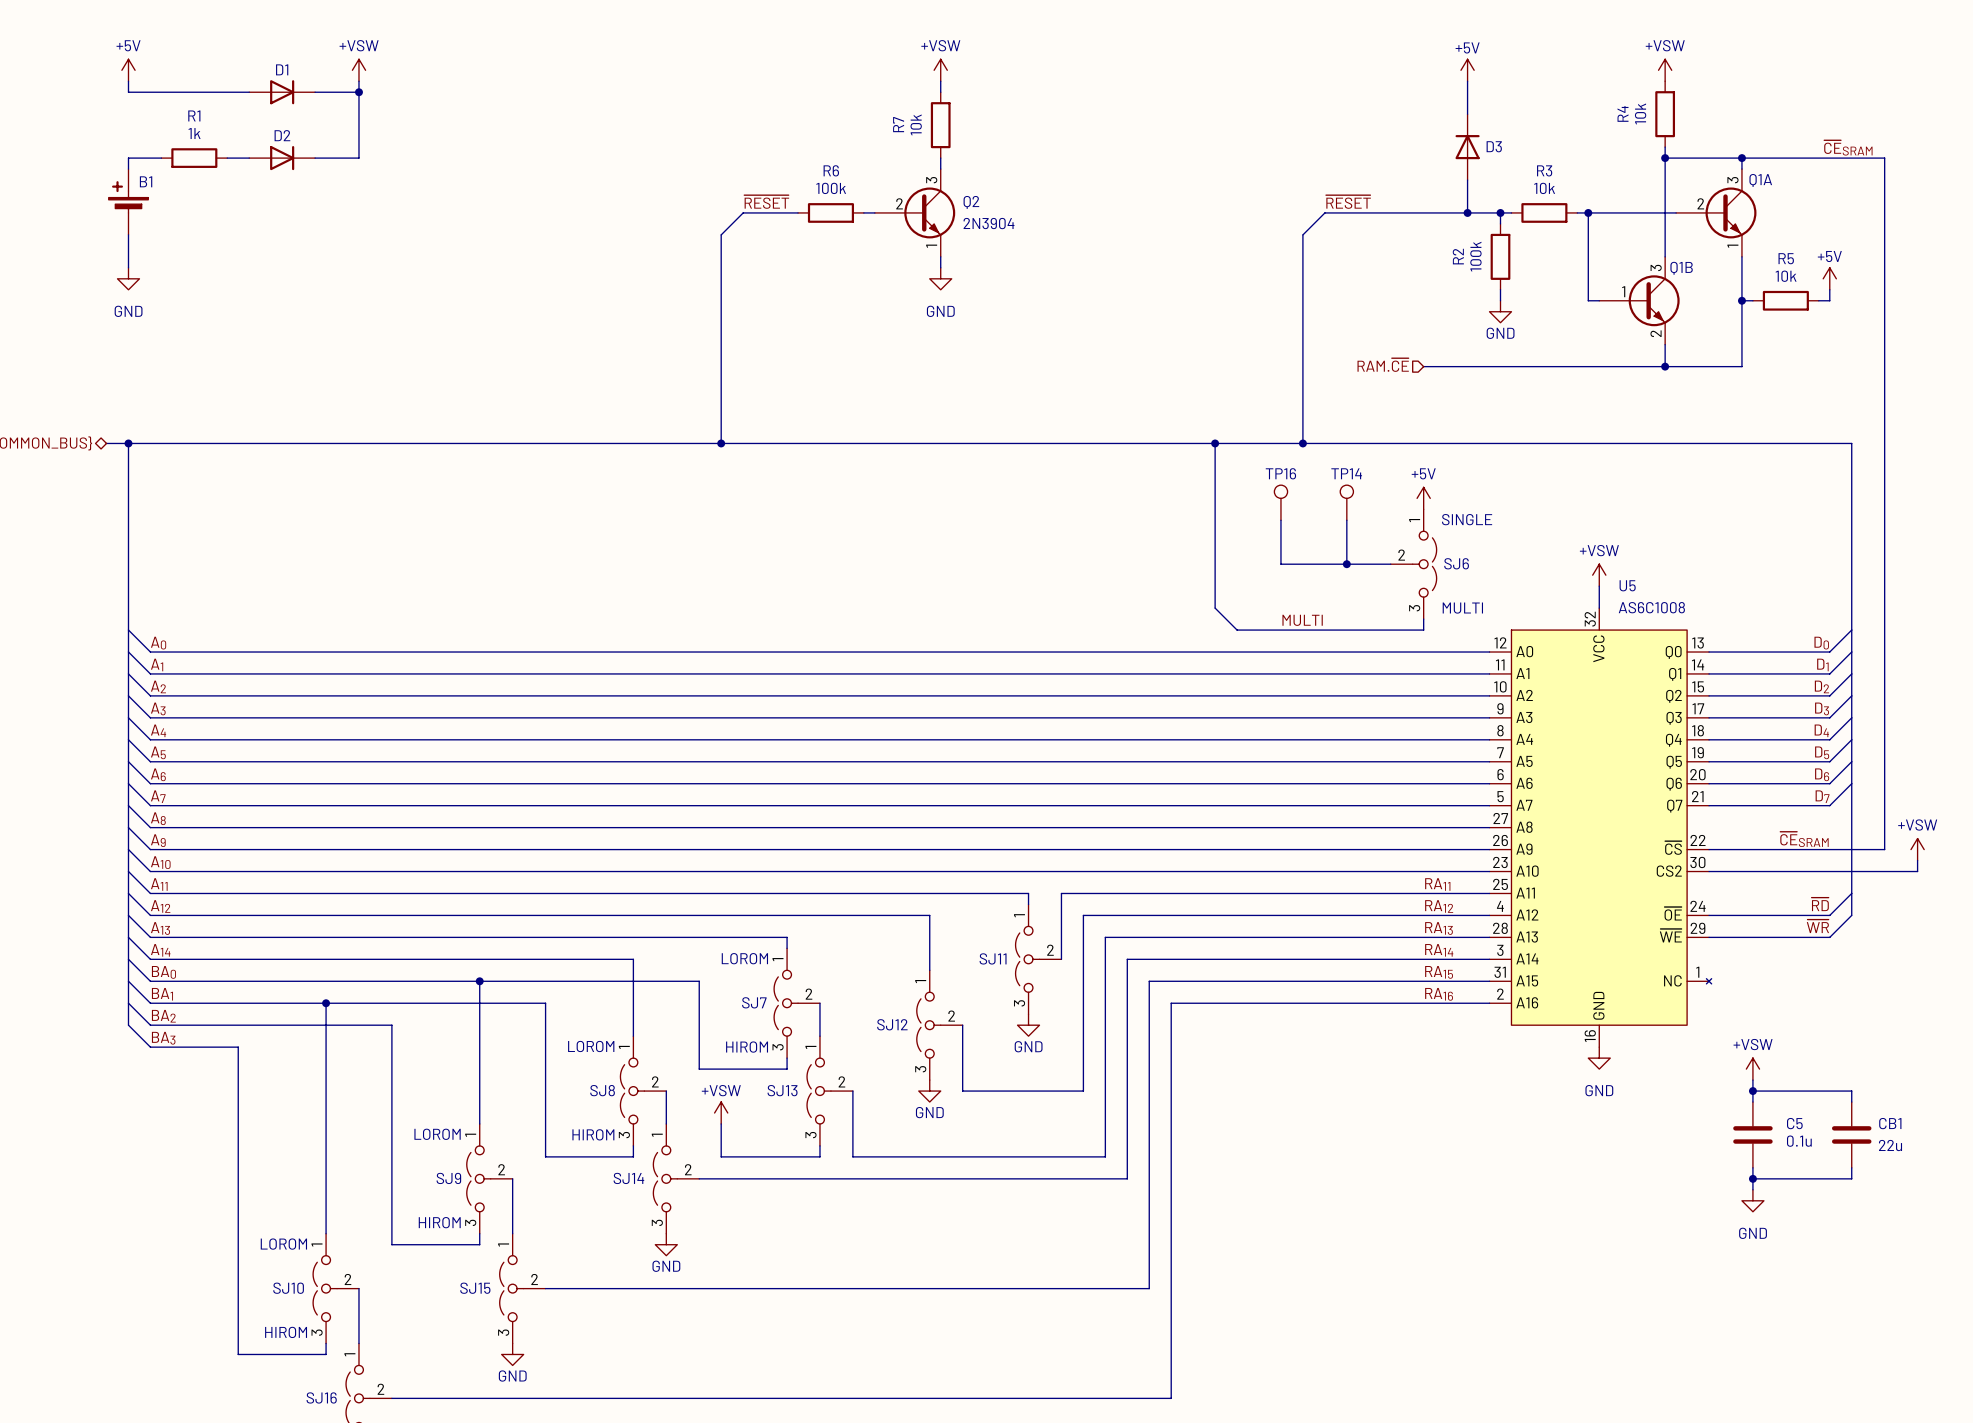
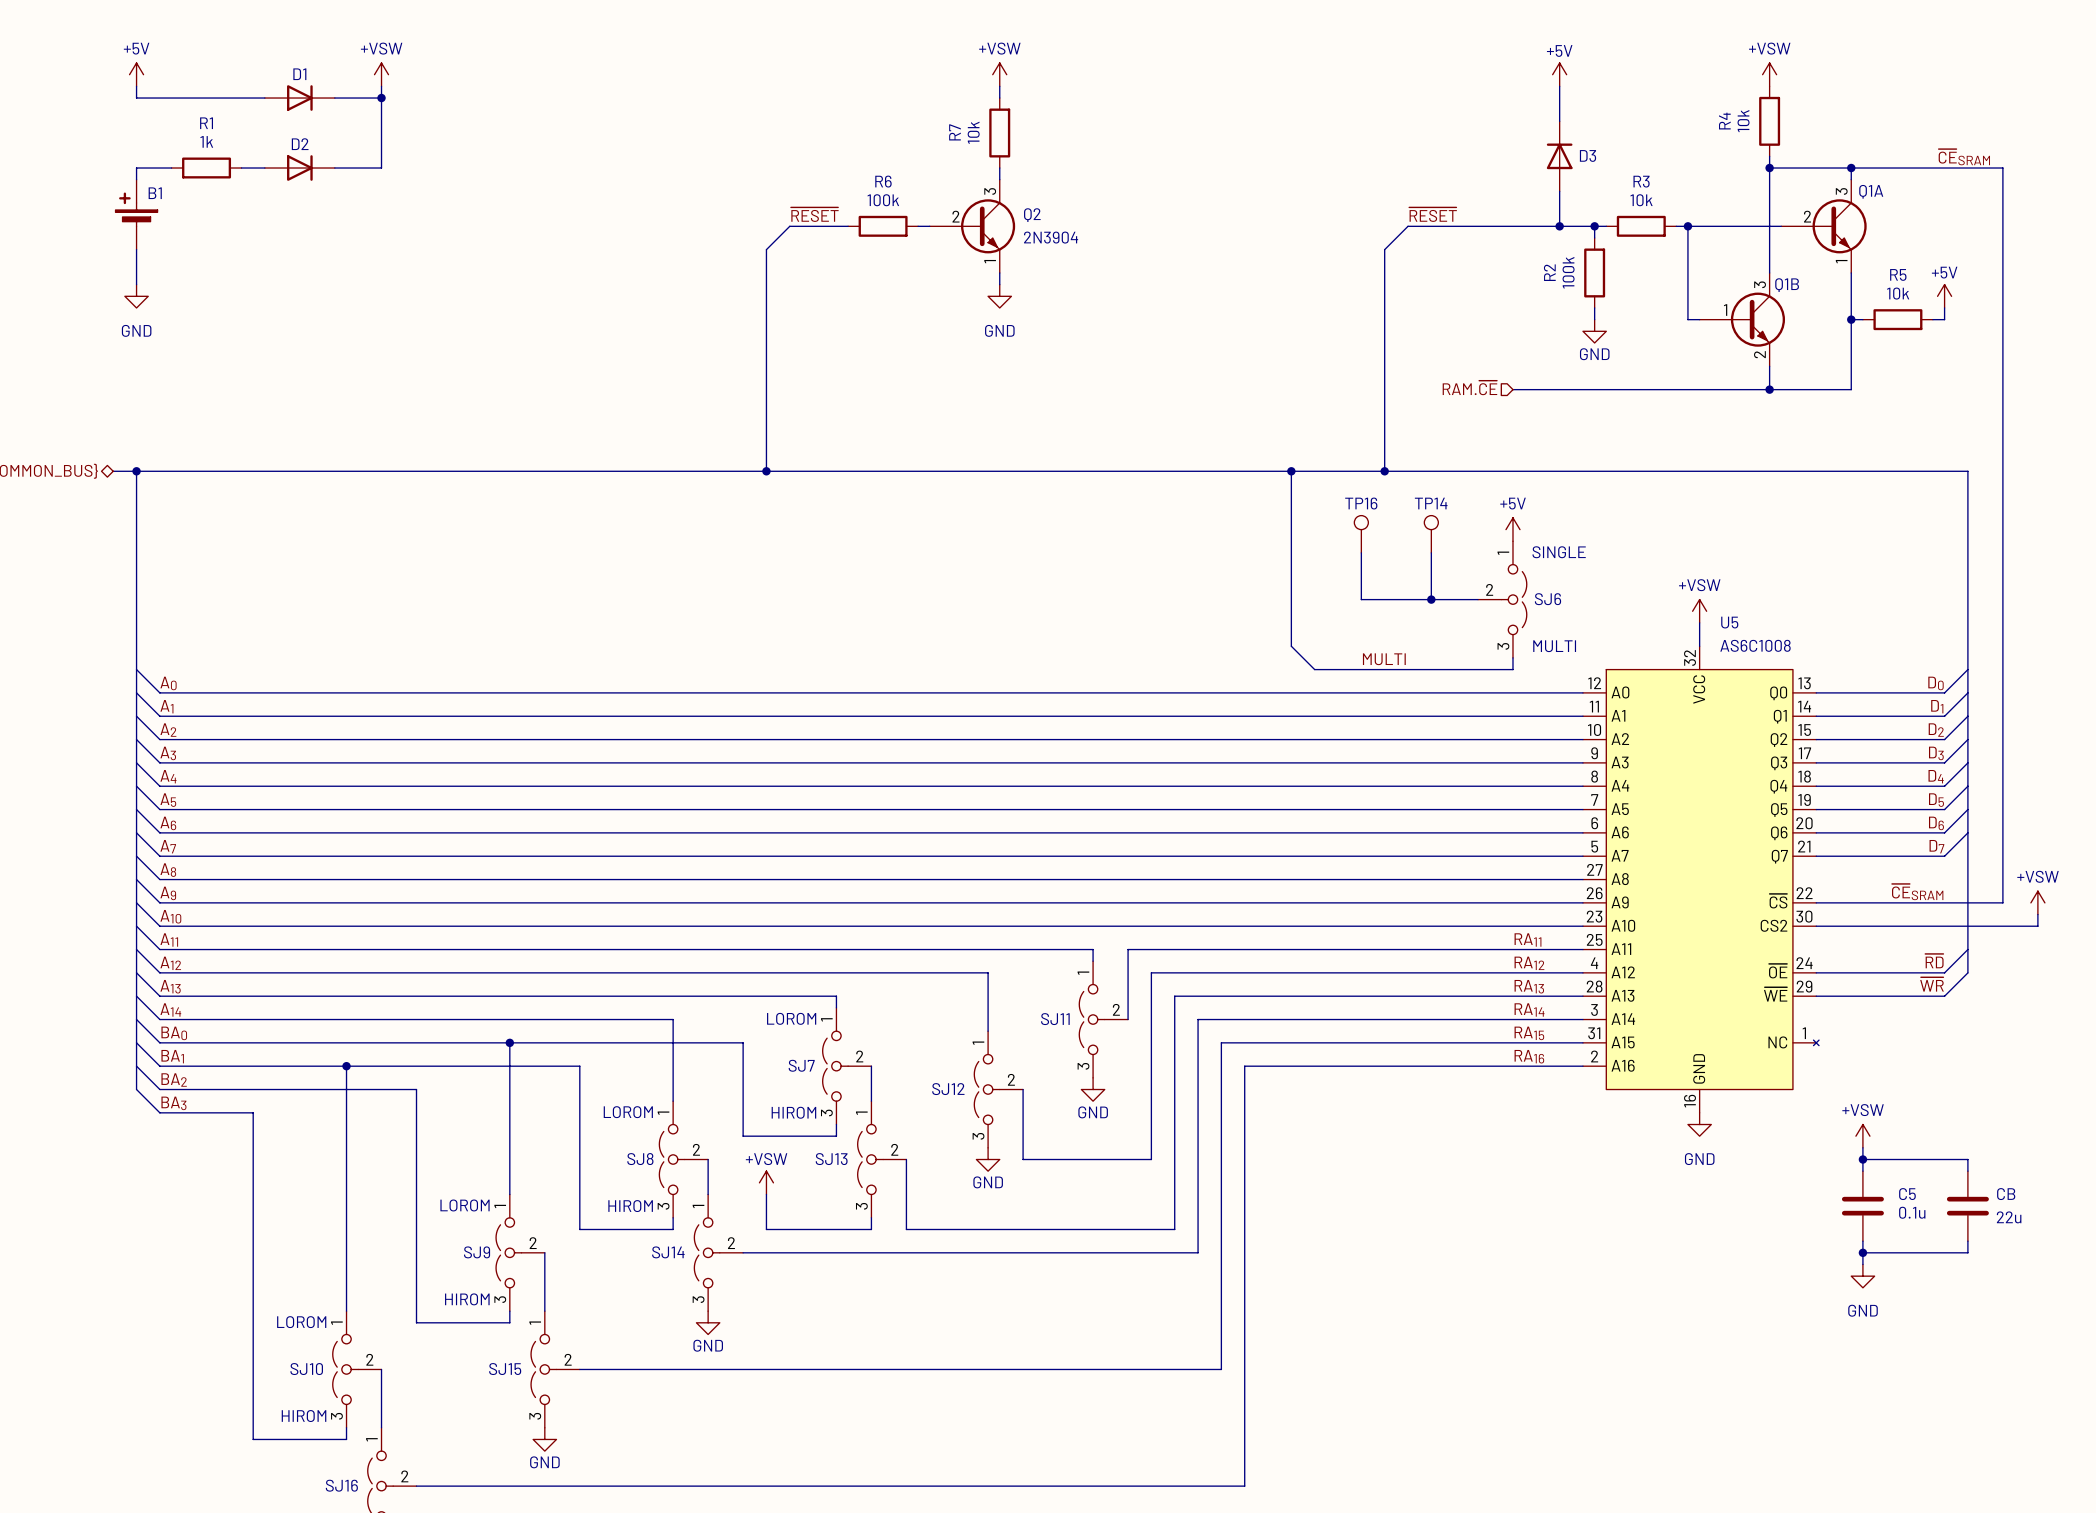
CB1 name: CB1 (1890, 1123) -> CB (2006, 1194)

